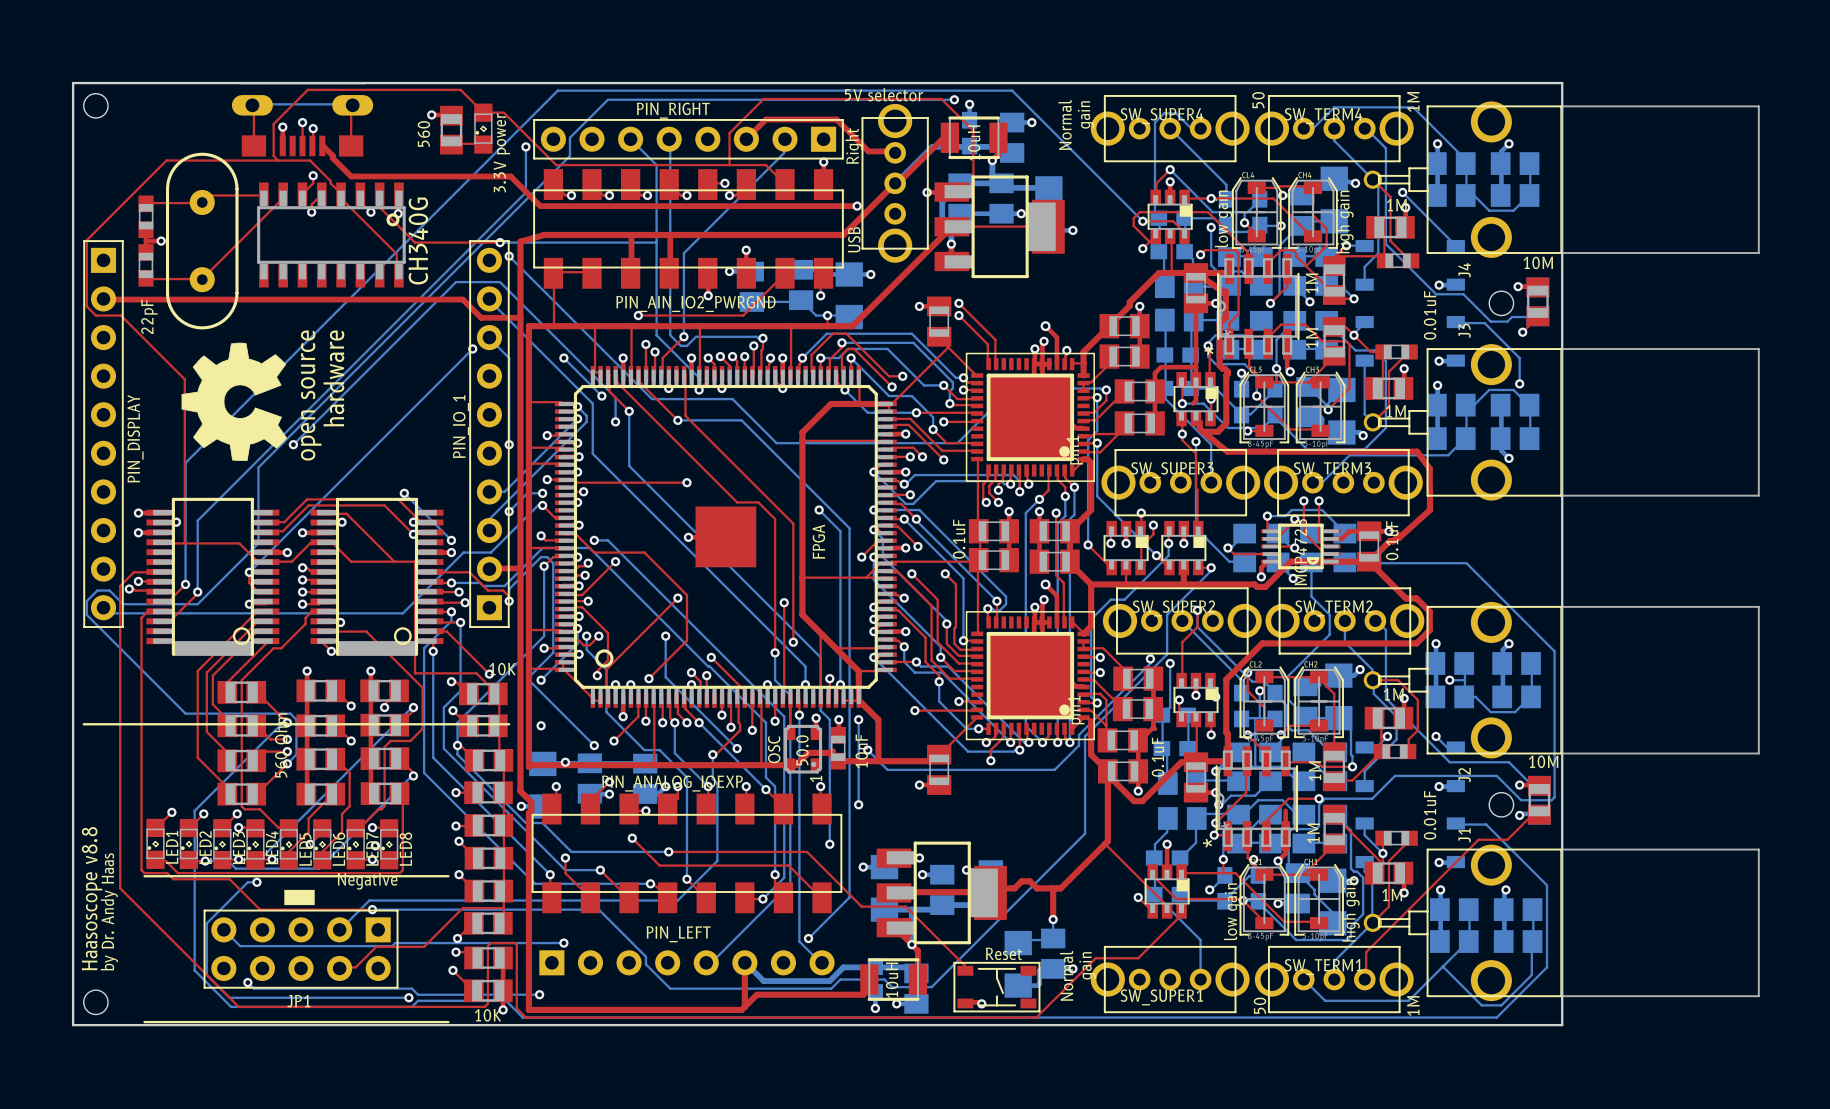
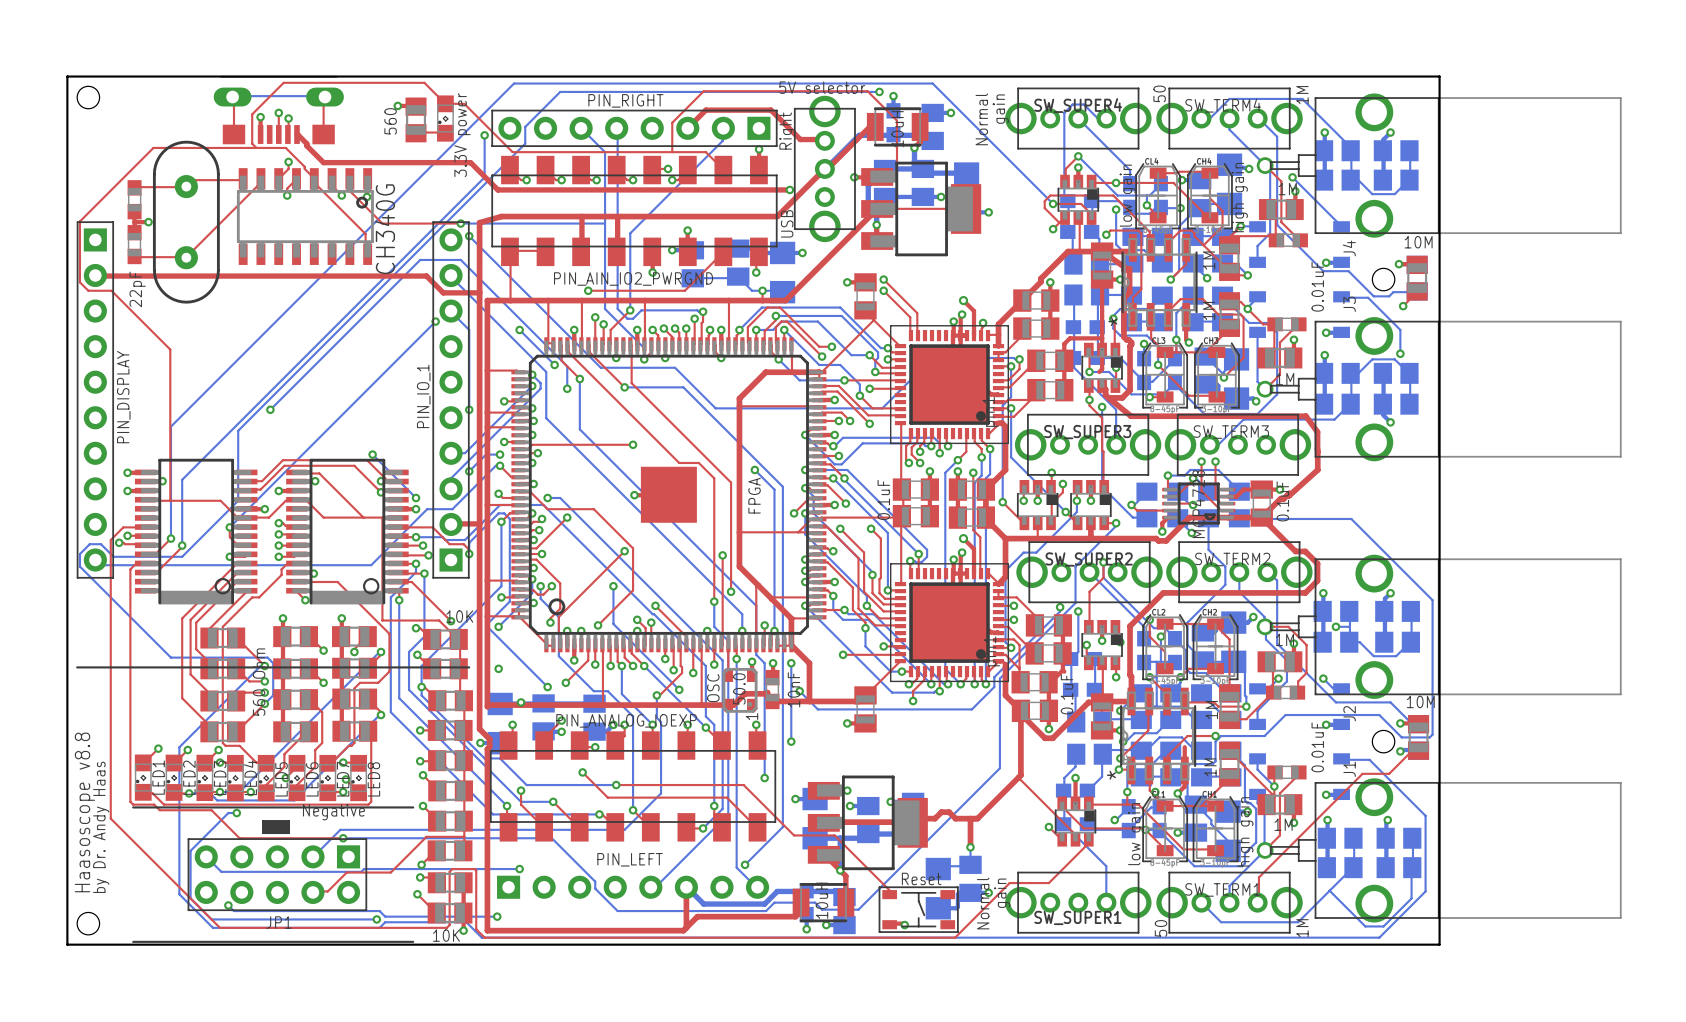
drawing: [181, 342, 287, 461] -> none

